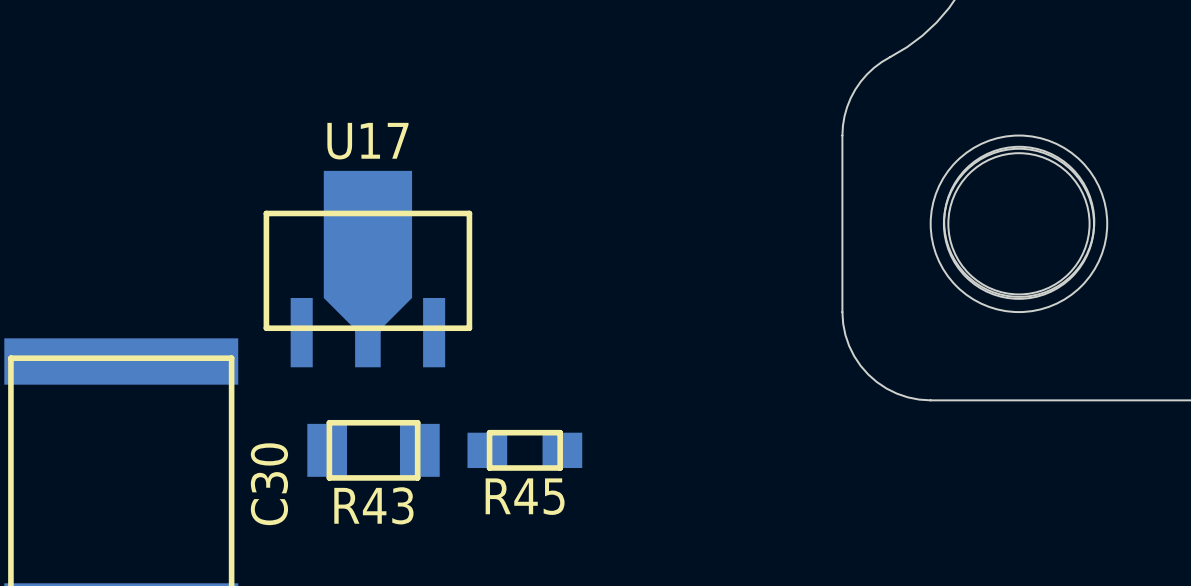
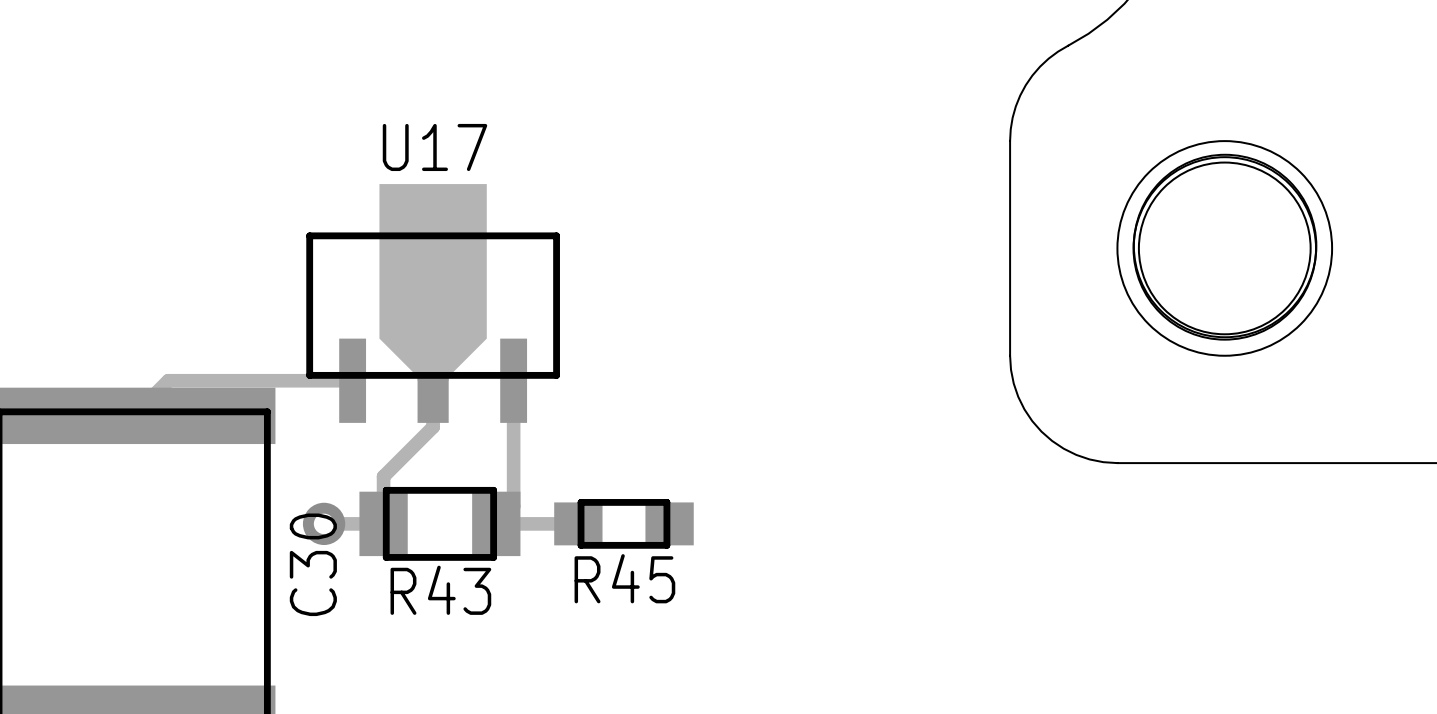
track: none -> (352, 380) (168, 380) (133, 415)
track: none -> (513, 380) (513, 506) (496, 523) (578, 523)
track: none -> (433, 399) (433, 427) (383, 476) (383, 523) (324, 523)
via: none -> (324, 523)

